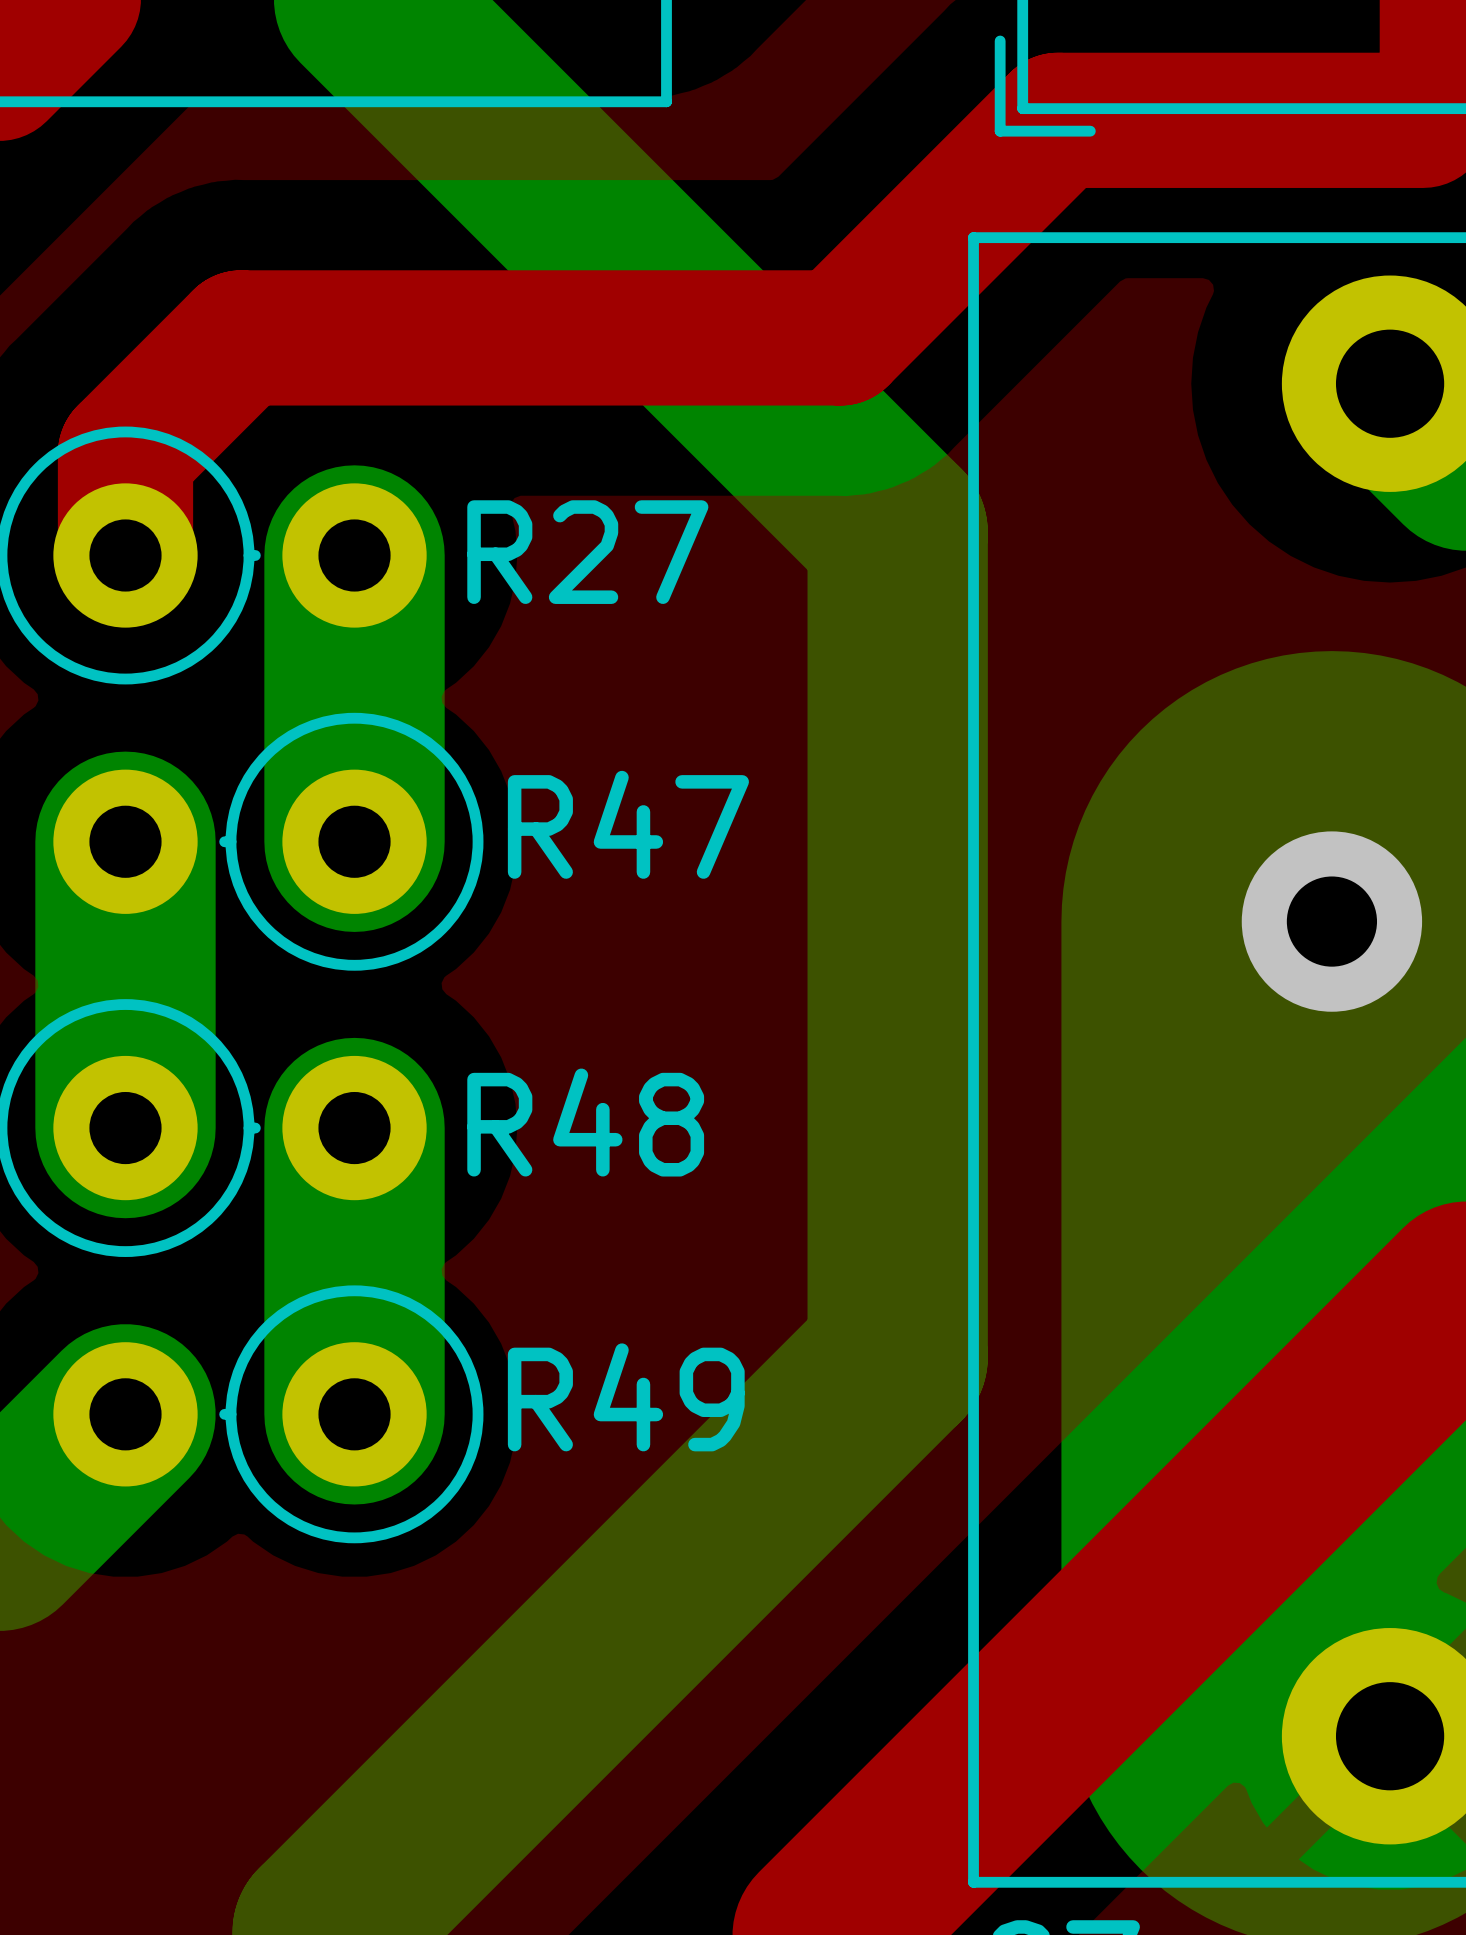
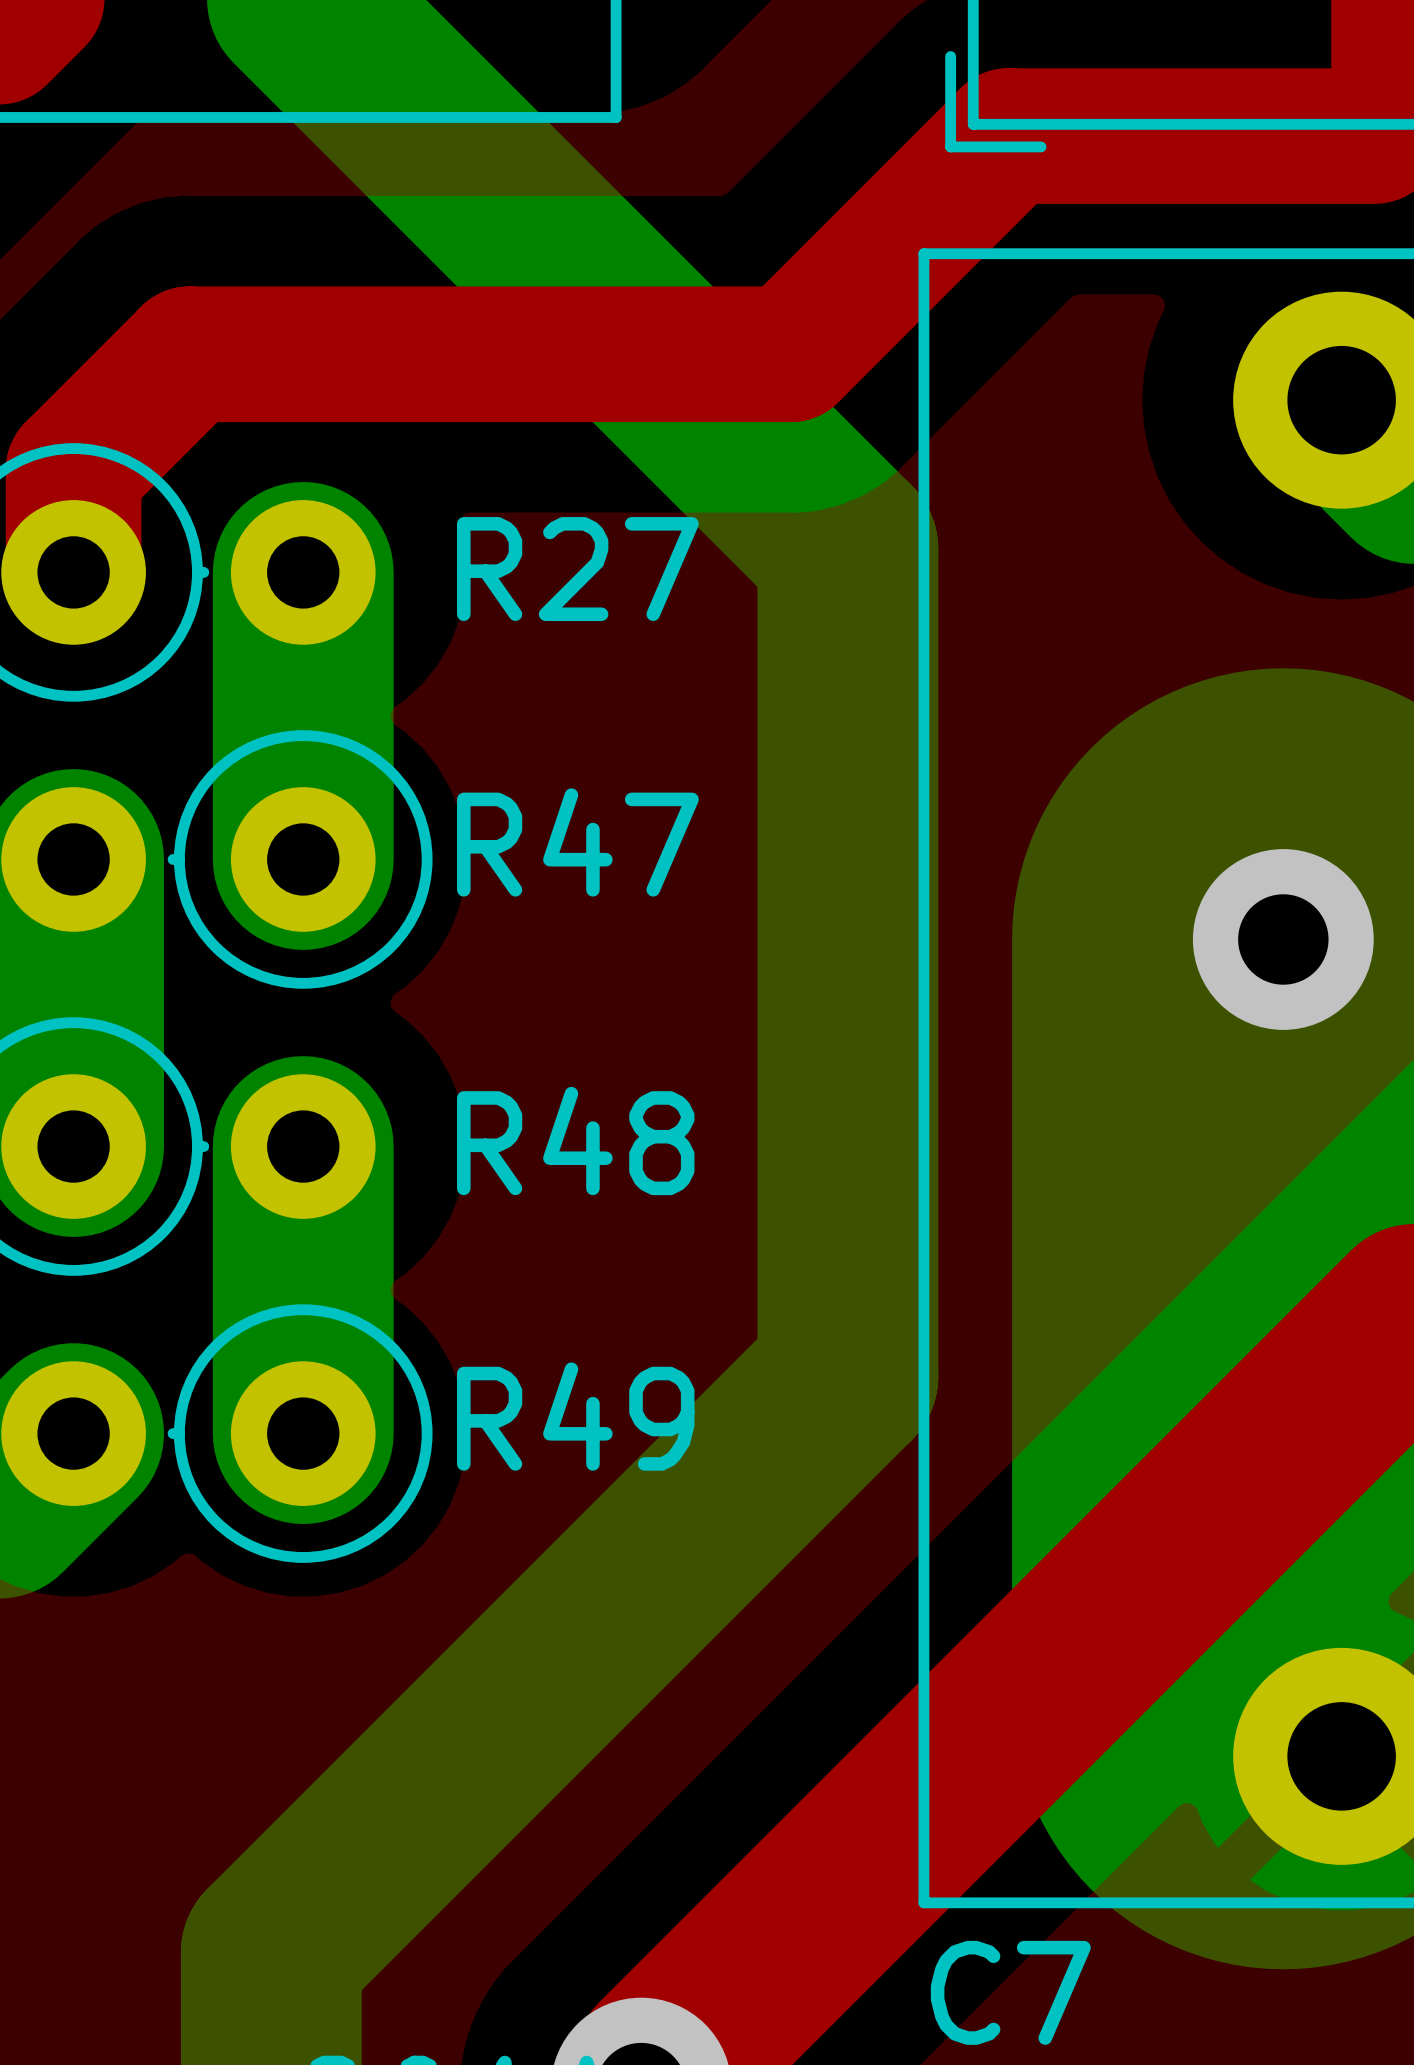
R27 name position: R27 (587, 552) -> R27 (577, 569)
R48 name position: R48 (585, 1122) -> R48 (575, 1141)

